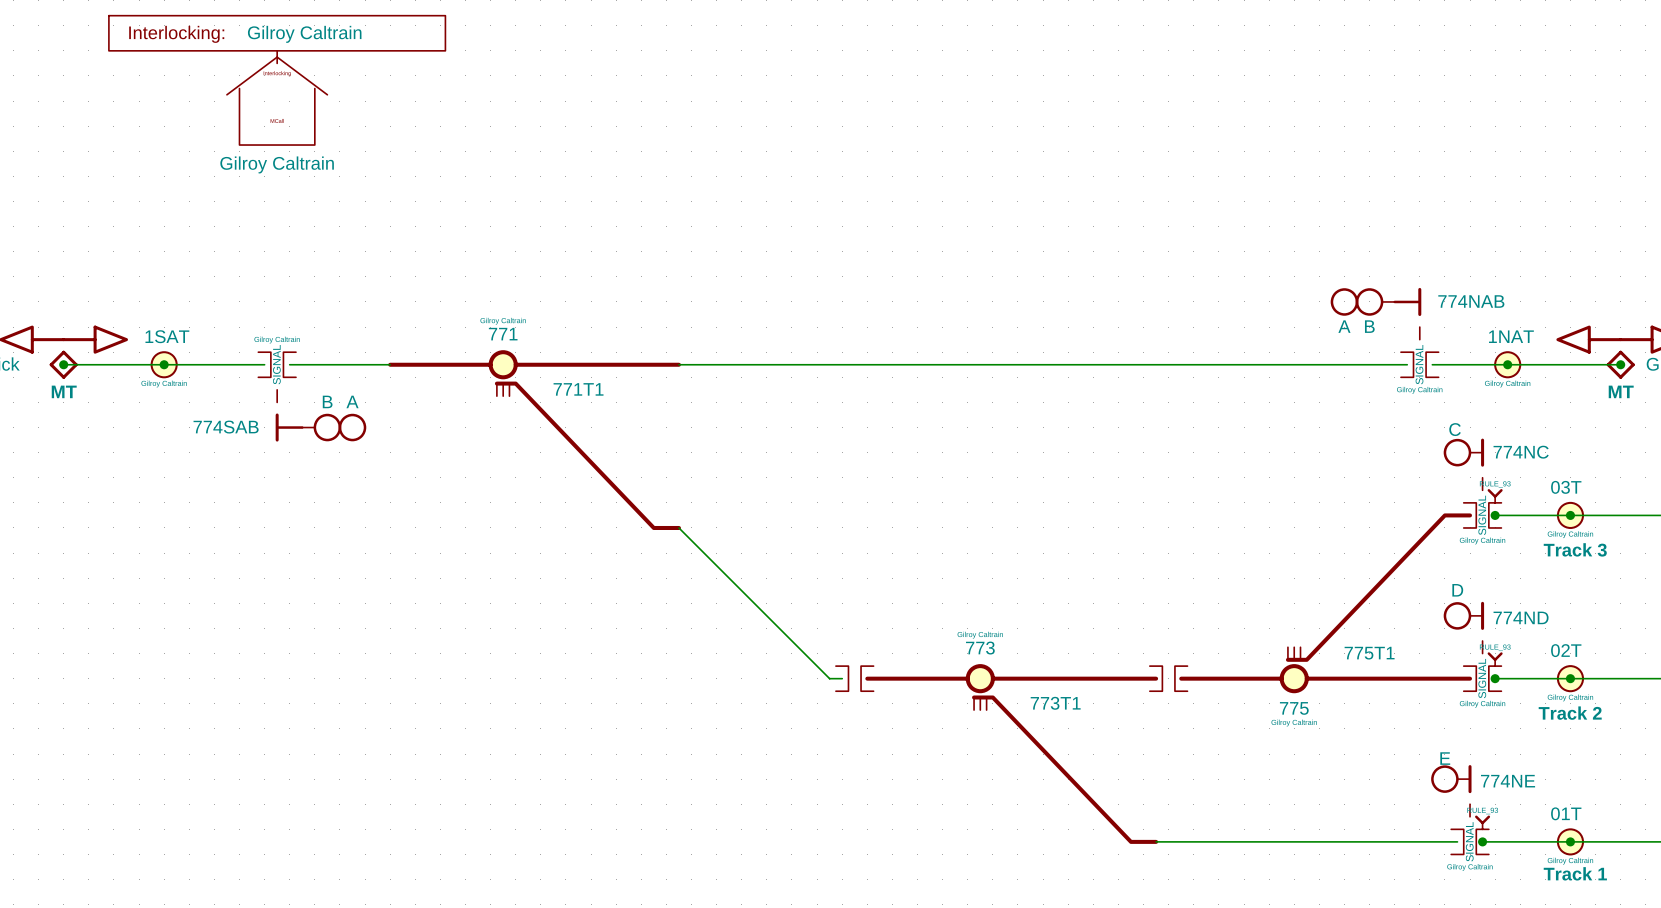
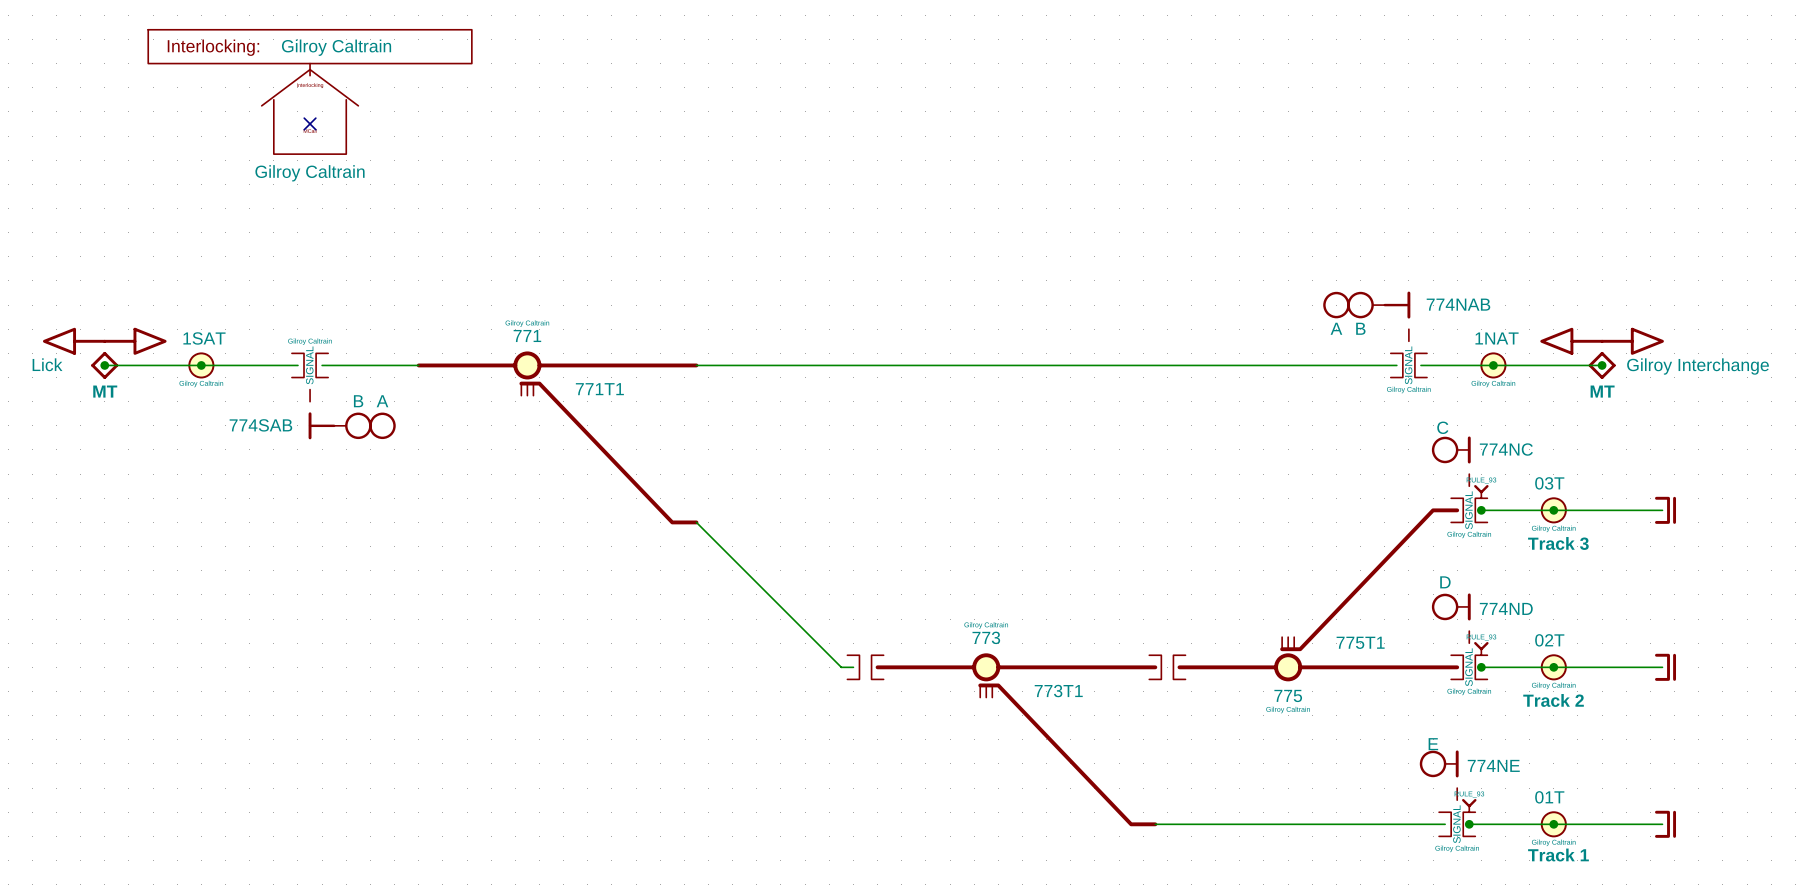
no-connect mark: none -> (310, 123)

